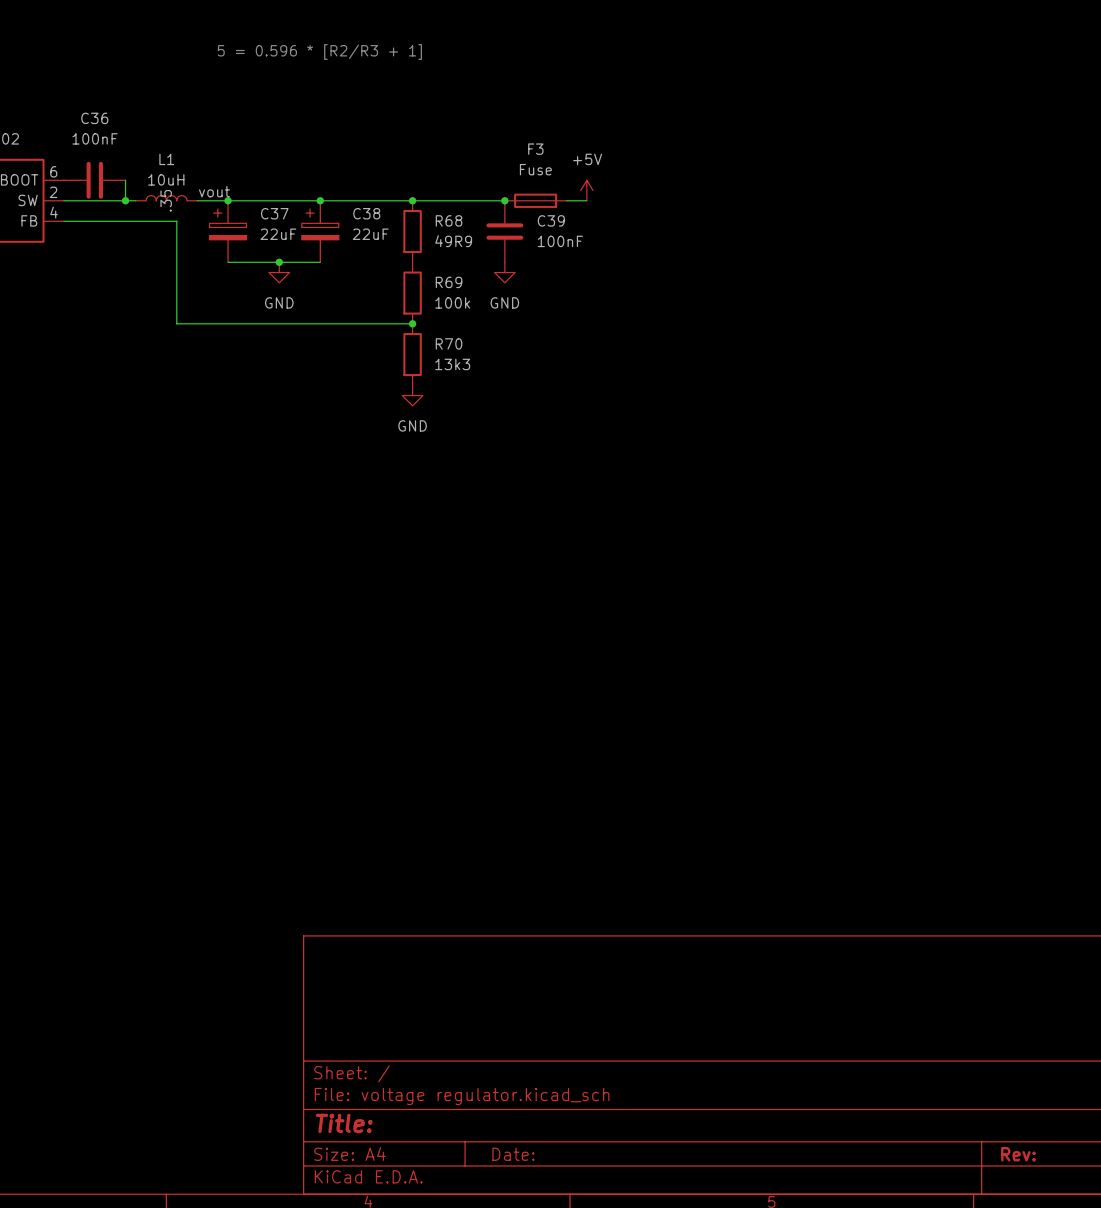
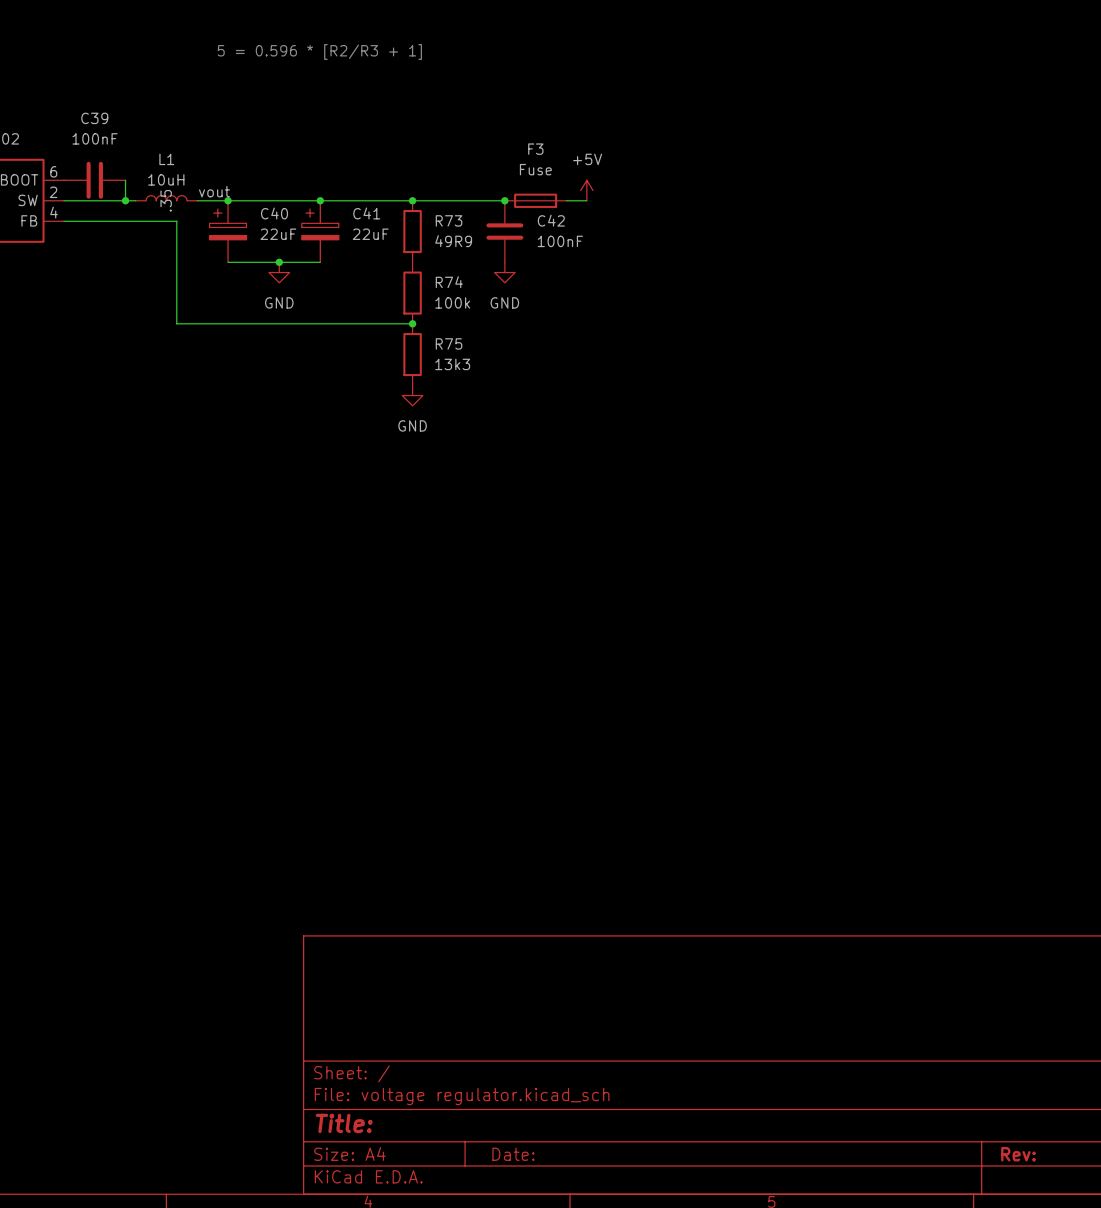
C36 name: C36 (94, 118) -> C39 (94, 118)
C37 name: C37 (274, 213) -> C40 (274, 213)
C38 name: C38 (366, 213) -> C41 (366, 213)
R68 name: R68 (449, 220) -> R73 (449, 220)
C39 name: C39 (551, 220) -> C42 (551, 220)
R69 name: R69 (449, 282) -> R74 (449, 282)
R70 name: R70 (449, 343) -> R75 (449, 343)

